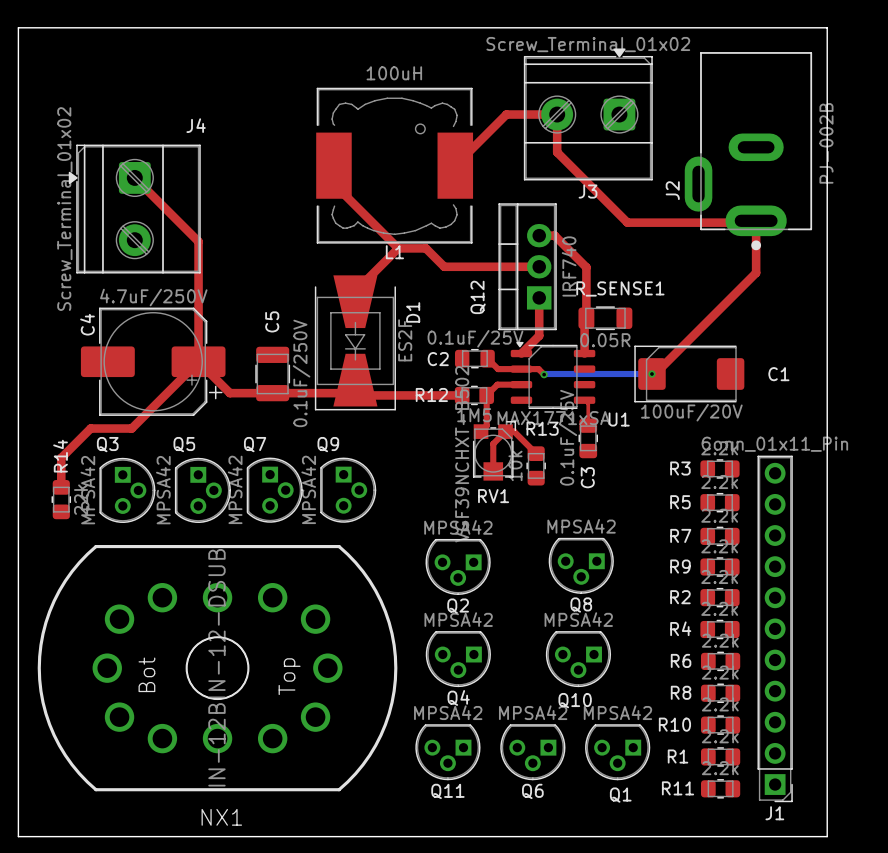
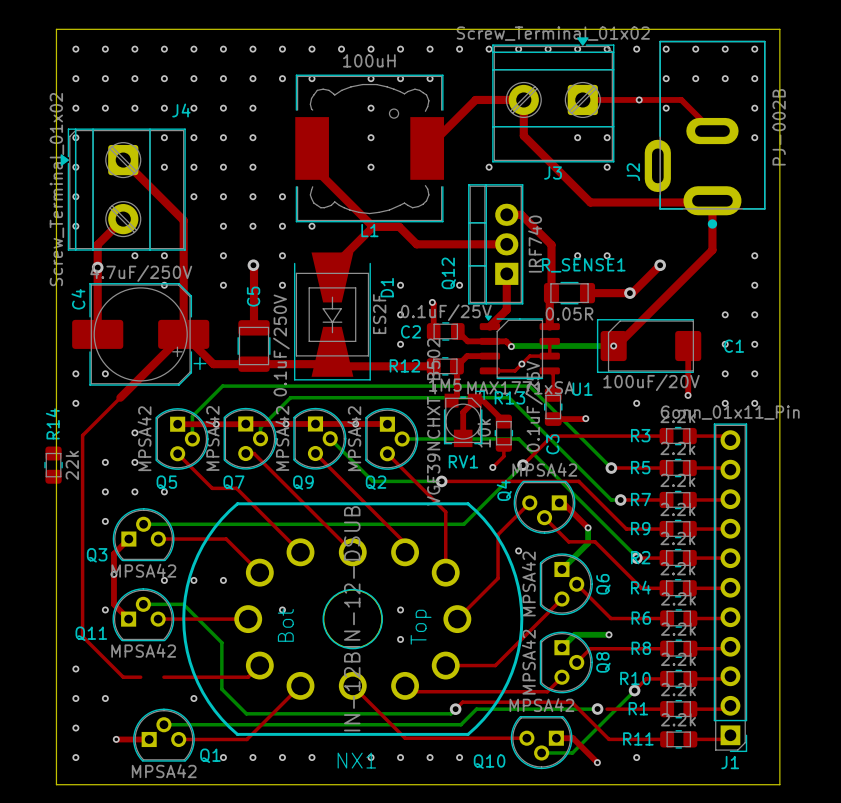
board edge: (827, 40) (827, 27) (18, 27) (18, 836) (64, 836) -> (779, 29) (56, 29) (56, 784)
via: none -> (75, 49)
via: none -> (105, 49)
via: none -> (134, 49)
via: none -> (164, 49)
via: none -> (193, 49)
via: none -> (223, 49)
via: none -> (252, 49)
via: none -> (282, 49)
via: none -> (311, 49)
via: none -> (341, 49)
via: none -> (371, 49)
via: none -> (400, 49)
via: none -> (430, 49)
via: none -> (459, 49)
via: none -> (489, 49)
via: none -> (518, 49)
via: none -> (548, 49)
via: none -> (577, 49)
via: none -> (607, 49)
via: none -> (636, 49)
via: none -> (666, 49)
via: none -> (695, 49)
via: none -> (725, 49)
via: none -> (754, 49)
via: none -> (75, 78)
via: none -> (105, 78)
via: none -> (134, 78)
via: none -> (164, 78)
via: none -> (193, 78)
via: none -> (223, 78)
via: none -> (252, 78)
via: none -> (282, 78)
via: none -> (311, 78)
via: none -> (371, 78)
via: none -> (400, 78)
via: none -> (430, 78)
via: none -> (666, 78)
via: none -> (695, 78)
via: none -> (725, 78)
via: none -> (754, 78)
top track: none -> (582, 99) (681, 99) (712, 131)
via: none -> (639, 99)
via: none -> (75, 108)
via: none -> (105, 108)
via: none -> (134, 108)
via: none -> (164, 108)
via: none -> (193, 108)
via: none -> (223, 108)
via: none -> (252, 108)
via: none -> (371, 108)
via: none -> (666, 108)
via: none -> (754, 108)
via: none -> (75, 137)
via: none -> (164, 137)
via: none -> (193, 137)
via: none -> (223, 137)
via: none -> (252, 137)
via: none -> (371, 137)
via: none -> (577, 137)
via: none -> (607, 137)
via: none -> (754, 137)
via: none -> (75, 167)
via: none -> (164, 167)
via: none -> (193, 167)
via: none -> (223, 167)
via: none -> (252, 167)
via: none -> (371, 167)
via: none -> (489, 167)
via: none -> (607, 167)
via: none -> (75, 196)
via: none -> (193, 196)
via: none -> (223, 196)
via: none -> (252, 196)
via: none -> (282, 196)
top track: none -> (123, 219) (97, 244) (97, 334)
via: none -> (75, 226)
via: none -> (223, 226)
via: none -> (252, 226)
via: none -> (282, 226)
via: none -> (311, 226)
via: none -> (134, 255)
via: none -> (164, 255)
via: none -> (223, 255)
via: none -> (282, 255)
via: none -> (577, 255)
via: none -> (607, 255)
via: none -> (754, 255)
top track: none -> (253, 265) (254, 327)
via: none -> (253, 265)
top track: none -> (660, 265) (632, 293) (587, 293)
via: none -> (660, 265)
via: none -> (97, 267)
via: none -> (164, 285)
via: none -> (223, 285)
via: none -> (282, 285)
via: none -> (400, 285)
via: none -> (459, 285)
via: none -> (754, 285)
via: none -> (629, 293)
top track: none -> (432, 302) (433, 331)
via: none -> (432, 302)
via: none -> (400, 314)
via: none -> (725, 314)
via: none -> (754, 314)
top track: none -> (549, 341) (549, 356) (529, 356) (515, 370) (489, 370)
via: none -> (400, 344)
via: none -> (725, 344)
via: none -> (754, 344)
top track: none -> (688, 346) (688, 395)
via: none -> (521, 364)
via: none -> (75, 373)
via: none -> (105, 373)
via: none -> (725, 373)
via: none -> (754, 373)
via: none -> (688, 395)
top track: (131, 428) (90, 428) (61, 457) (61, 487) -> (120, 397) (82, 435) (82, 636) (123, 677) (140, 677)
via: none -> (75, 403)
via: none -> (636, 403)
via: none -> (725, 403)
via: none -> (754, 403)
Q5 name position: Q5 (184, 444) -> Q5 (166, 482)
Q7 name position: Q7 (255, 444) -> Q7 (233, 482)
Q9 name position: Q9 (328, 444) -> Q9 (303, 482)
top track: none -> (585, 418) (553, 419)
via: none -> (585, 418)
top track: none -> (177, 424) (387, 424)
via: none -> (216, 424)
via: none -> (285, 423)
via: none -> (355, 423)
via: none -> (134, 432)
top track: none -> (666, 436) (552, 436) (523, 465)
top track: none -> (689, 436) (726, 436) (730, 440)
bottom track: none -> (260, 438) (260, 427) (290, 397) (509, 397) (611, 499) (620, 499)
bottom track: none -> (330, 438) (372, 481) (441, 481)
bottom track: none -> (192, 438) (192, 416) (222, 386) (529, 386) (611, 468)
bottom track: none -> (402, 438) (518, 438) (636, 558)
top track: none -> (503, 444) (503, 456) (492, 467)
top track: none -> (177, 453) (212, 488) (236, 488) (300, 552)
top track: none -> (245, 453) (253, 453) (352, 552)
top track: none -> (315, 453) (405, 543) (405, 552)
top track: none -> (387, 453) (445, 512) (445, 572)
Q3 rotation: 0° (127, 490) -> 90° counterclockwise (143, 534)
Q3 position: (127, 490) -> (143, 534)
Q5 position: (202, 490) -> (182, 438)
Q7 position: (274, 490) -> (250, 438)
Q9 position: (348, 490) -> (319, 438)
via: none -> (105, 462)
via: none -> (134, 462)
bottom track: none -> (523, 465) (463, 524) (143, 524)
via: none -> (523, 465)
via: none -> (492, 467)
top track: none -> (611, 468) (666, 468)
via: none -> (611, 468)
top track: none -> (689, 468) (728, 468) (730, 469)
top track: none -> (441, 481) (578, 481) (626, 529) (666, 529)
via: none -> (441, 481)
via: none -> (105, 491)
via: none -> (134, 491)
via: none -> (164, 491)
top track: none -> (730, 499) (689, 499)
top track: none -> (620, 499) (666, 499)
via: none -> (620, 499)
top track: none -> (529, 502) (498, 534) (498, 578) (457, 619)
top track: none -> (559, 502) (563, 502) (588, 527)
top track: none -> (544, 517) (568, 541) (595, 541) (641, 588) (666, 588)
via: none -> (105, 521)
Q8 rotation: 0° (581, 565) -> 90° counterclockwise (566, 662)
Q8 position: (581, 565) -> (566, 662)
bottom track: none -> (588, 527) (588, 543) (561, 569)
via: none -> (588, 527)
Q2 rotation: 0° (458, 566) -> 90° counterclockwise (391, 438)
Q2 position: (458, 566) -> (391, 438)
top track: none -> (730, 528) (689, 529)
top track: none -> (128, 539) (113, 553) (113, 604) (128, 619)
top track: none -> (158, 539) (226, 539) (259, 572)
via: none -> (518, 550)
top track: none -> (636, 558) (666, 558)
via: none -> (636, 558)
top track: none -> (689, 558) (730, 558)
via: none -> (113, 574)
via: none -> (164, 580)
via: none -> (193, 580)
via: none -> (223, 580)
top track: none -> (576, 584) (611, 618) (667, 618)
top track: none -> (730, 587) (689, 588)
top track: none -> (561, 599) (495, 665) (445, 665)
bottom track: none -> (143, 604) (183, 604) (221, 642) (221, 689) (246, 713) (450, 713) (455, 709)
via: none -> (105, 609)
via: none -> (282, 609)
via: none -> (400, 609)
Q4 position: (458, 659) -> (544, 507)
Q10 position: (578, 659) -> (541, 742)
top track: none -> (730, 617) (690, 618)
top track: none -> (158, 619) (248, 619)
NX1 position: (217, 668) -> (352, 619)
bottom track: none -> (609, 634) (574, 634) (561, 647)
via: none -> (609, 634)
via: none -> (400, 639)
top track: none -> (730, 646) (728, 648) (690, 648)
top track: none -> (667, 648) (590, 648) (576, 662)
Q4 name rotation: 0° (458, 697) -> 90° counterclockwise (504, 490)
Q4 name position: Q4 (458, 697) -> Q4 (504, 490)
Q10 name position: Q10 (575, 700) -> Q10 (489, 761)
top track: none -> (259, 665) (248, 677) (163, 677)
via: none -> (75, 668)
top track: none -> (730, 676) (727, 678) (690, 678)
top track: none -> (561, 677) (547, 691) (410, 691) (405, 685)
top track: none -> (667, 678) (646, 678) (634, 690)
top track: none -> (300, 685) (246, 739) (178, 739)
top track: none -> (352, 685) (405, 738) (526, 738)
bottom track: none -> (634, 690) (572, 752) (541, 752)
via: none -> (634, 690)
via: none -> (75, 698)
via: none -> (105, 698)
via: none -> (193, 698)
Q11 rotation: 0° (447, 752) -> 180° (143, 614)
Q11 position: (447, 752) -> (143, 614)
Q6 rotation: 0° (532, 752) -> 90° counterclockwise (566, 584)
Q6 position: (532, 752) -> (566, 584)
Q1 rotation: 0° (617, 752) -> 180° (163, 735)
Q1 position: (617, 752) -> (163, 735)
top track: none -> (730, 705) (727, 709) (690, 709)
top track: none -> (455, 709) (462, 702) (571, 702) (609, 739) (667, 739)
via: none -> (455, 709)
bottom track: none -> (597, 709) (476, 709) (460, 724) (163, 724)
via: none -> (597, 709)
top track: none -> (607, 709) (667, 709)
via: none -> (75, 728)
top track: none -> (730, 735) (726, 739) (690, 739)
top track: none -> (556, 738) (573, 738) (597, 762)
top track: none -> (116, 739) (149, 739)
via: none -> (116, 739)
Q11 name position: Q11 (447, 791) -> Q11 (91, 633)
Q1 name position: Q1 (620, 795) -> Q1 (210, 755)
via: none -> (75, 757)
via: none -> (223, 757)
via: none -> (252, 757)
via: none -> (282, 757)
via: none -> (311, 757)
via: none -> (371, 757)
via: none -> (400, 757)
via: none -> (430, 757)
via: none -> (459, 757)
via: none -> (636, 757)
via: none -> (597, 762)

